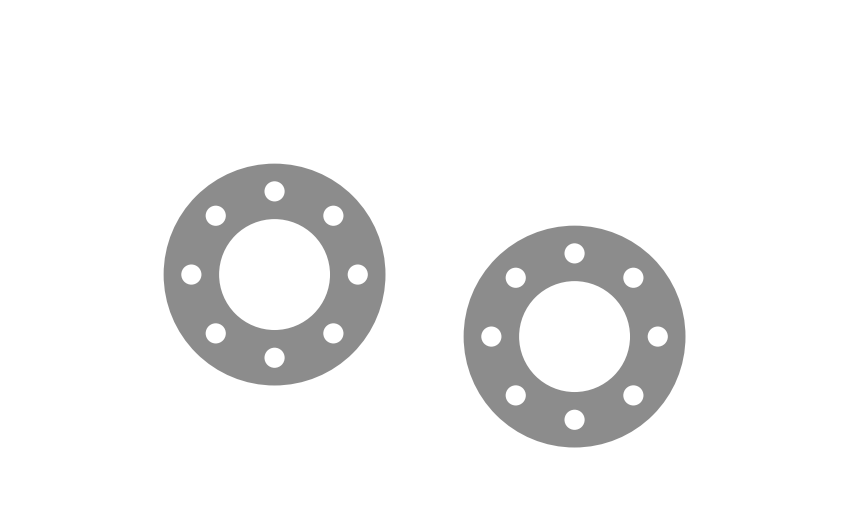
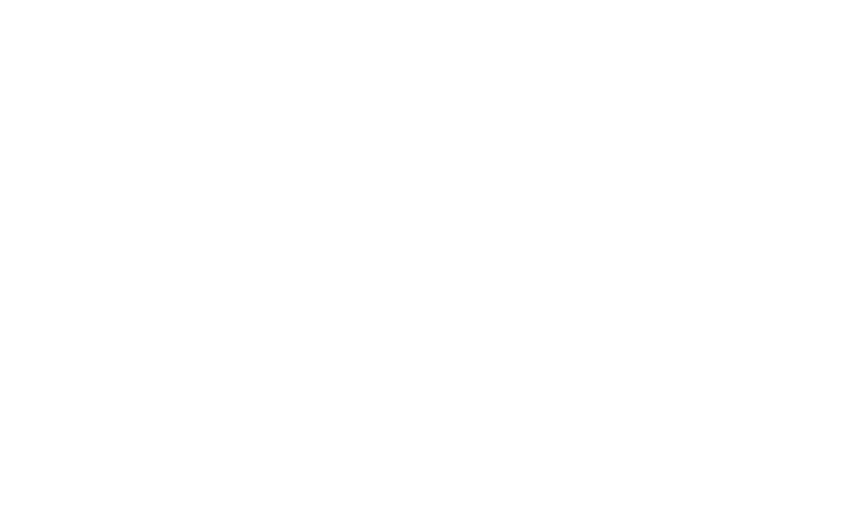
part: (274, 274) -> none
part: (574, 336) -> none

